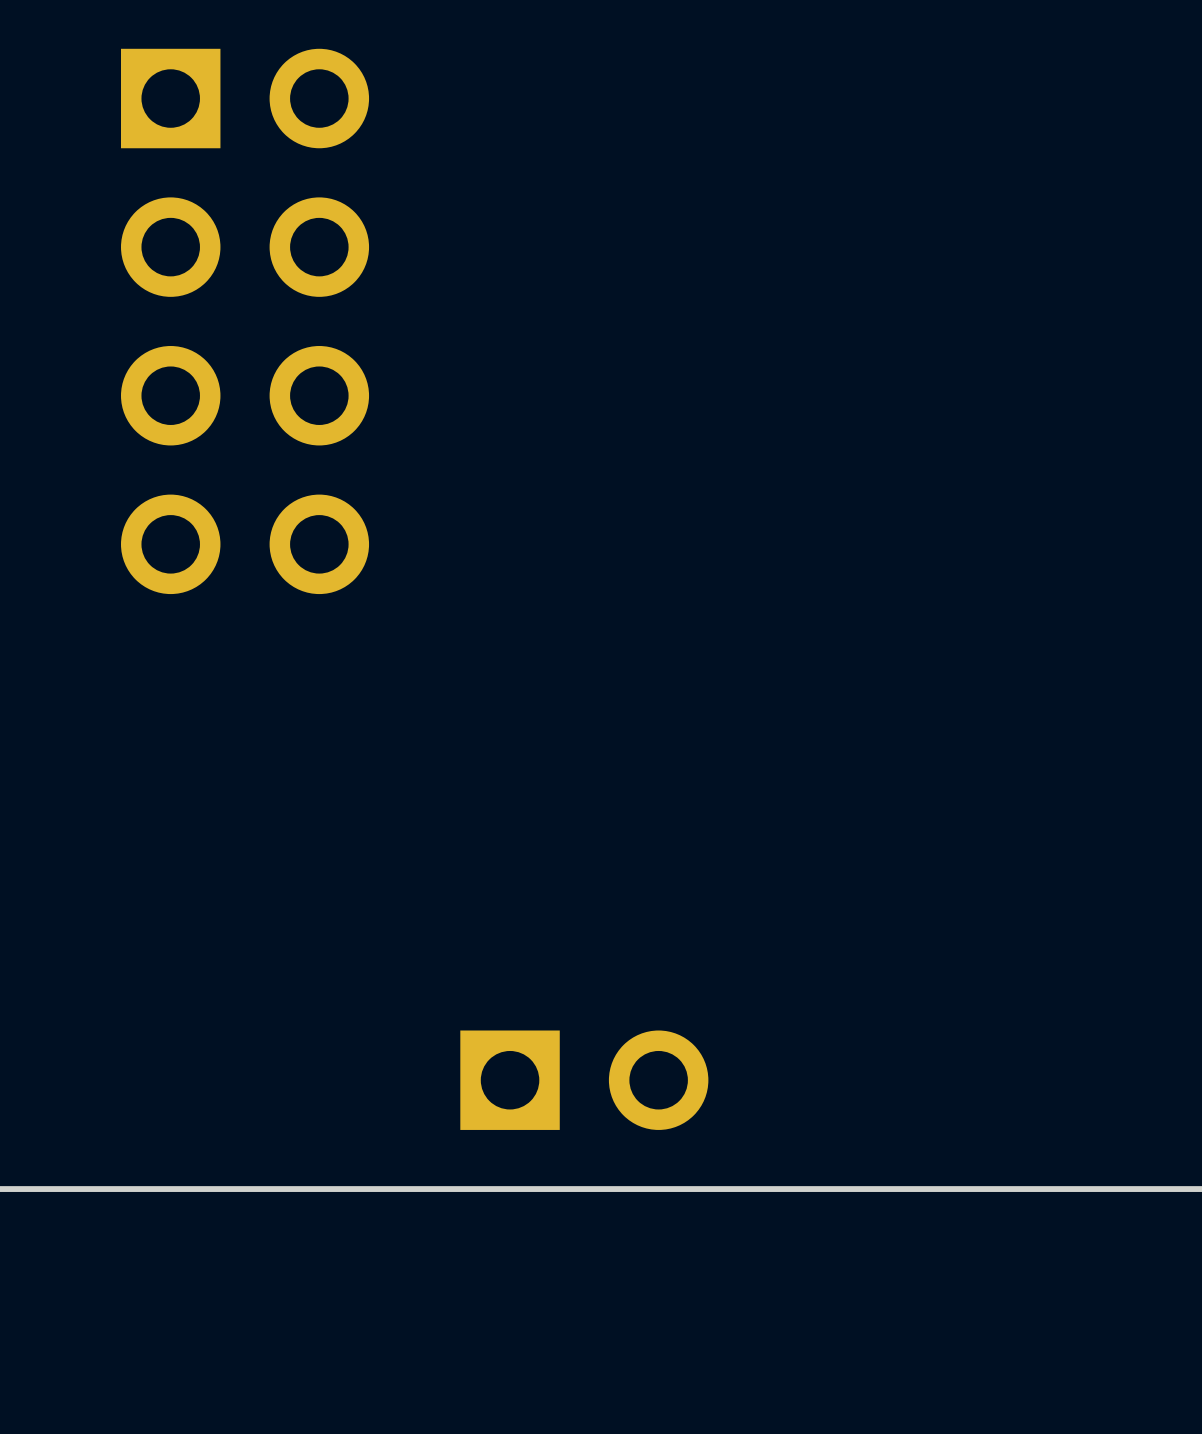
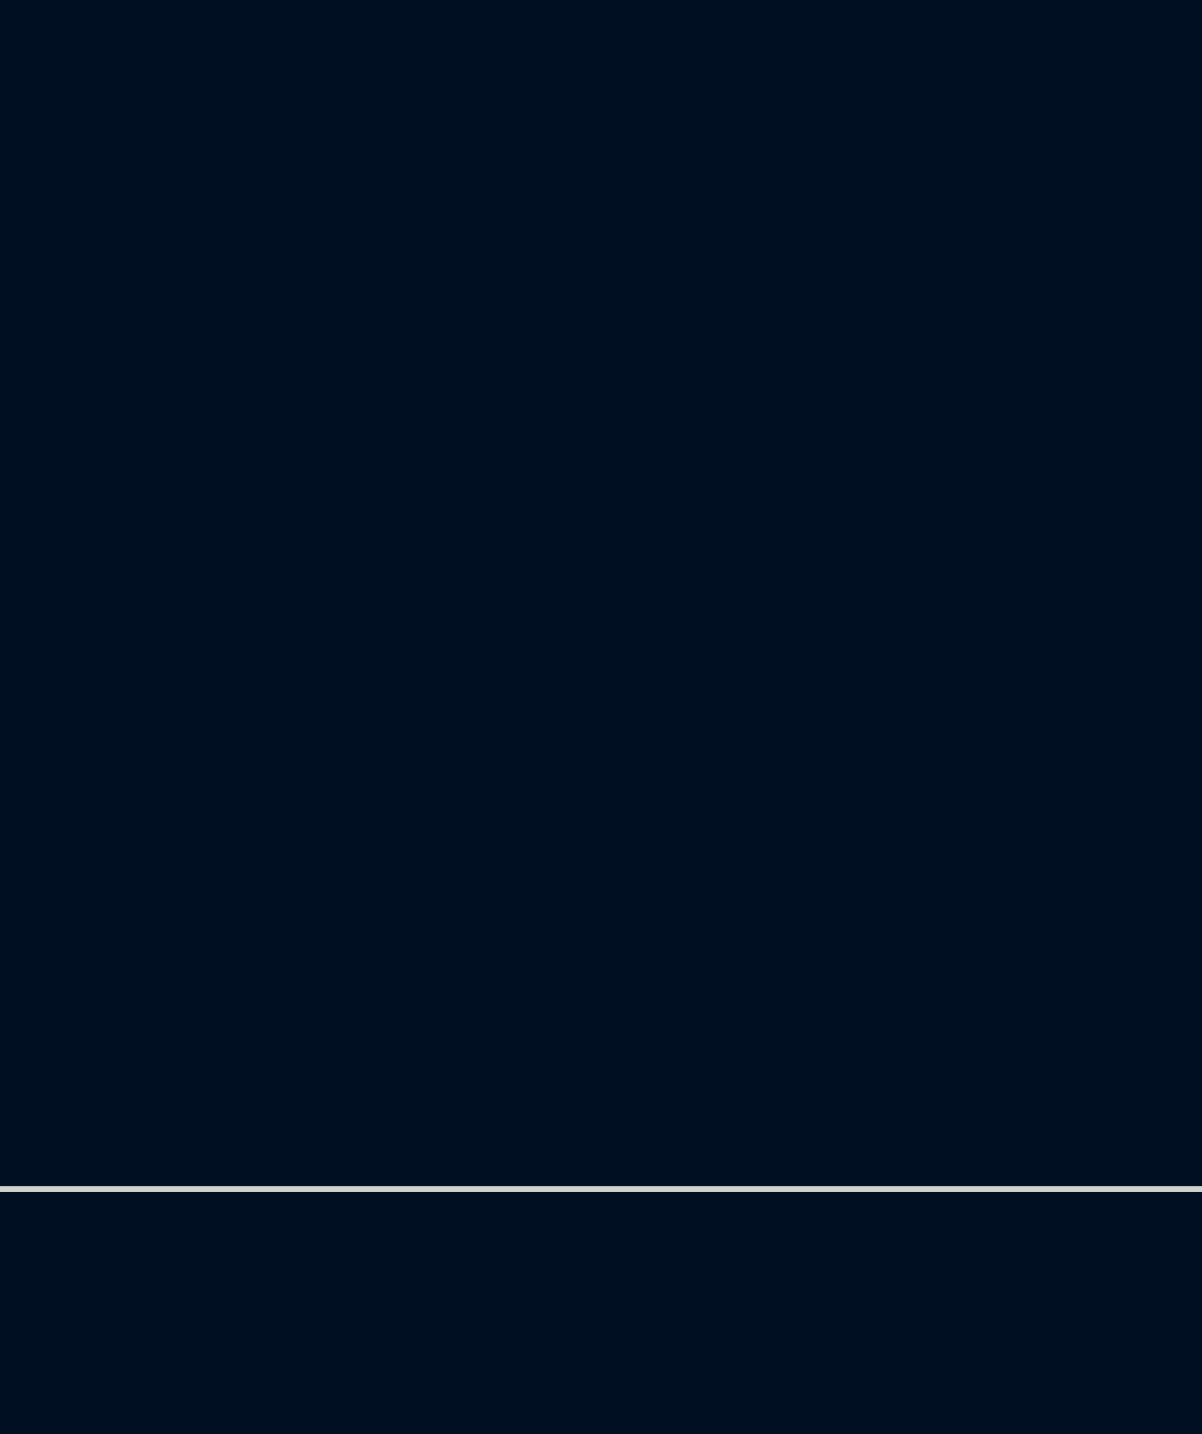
part: (245, 321) -> none
part: (584, 1080) -> none

